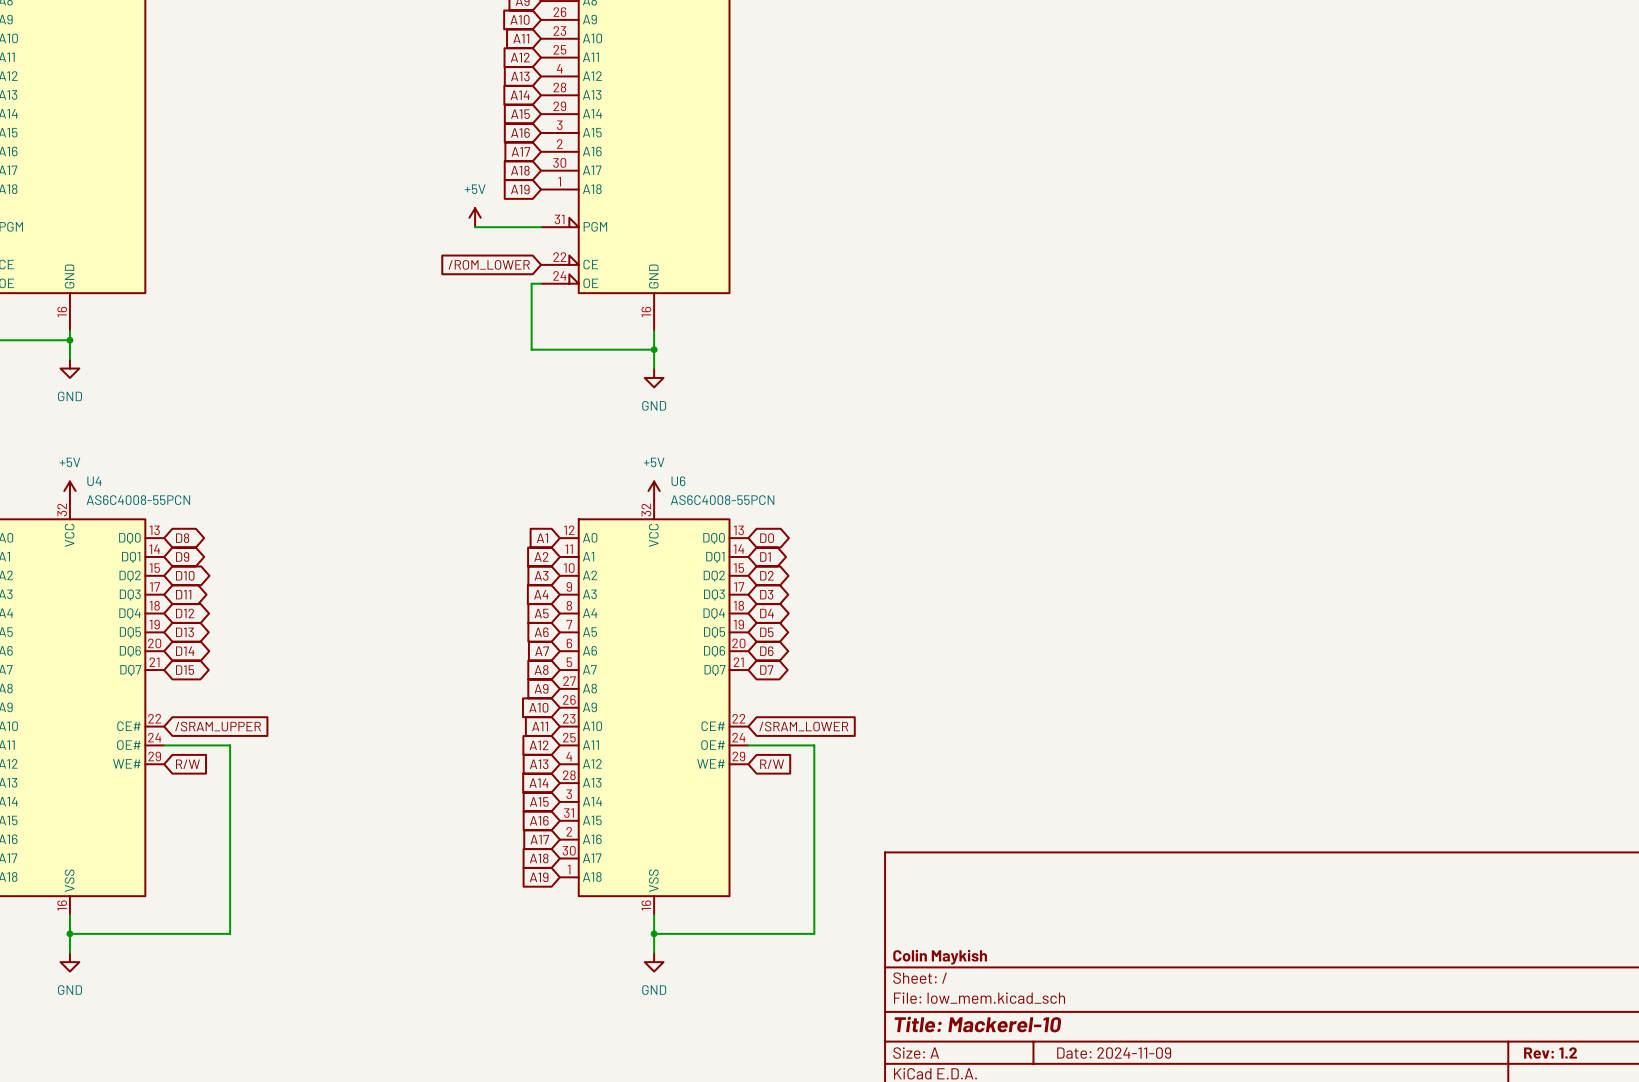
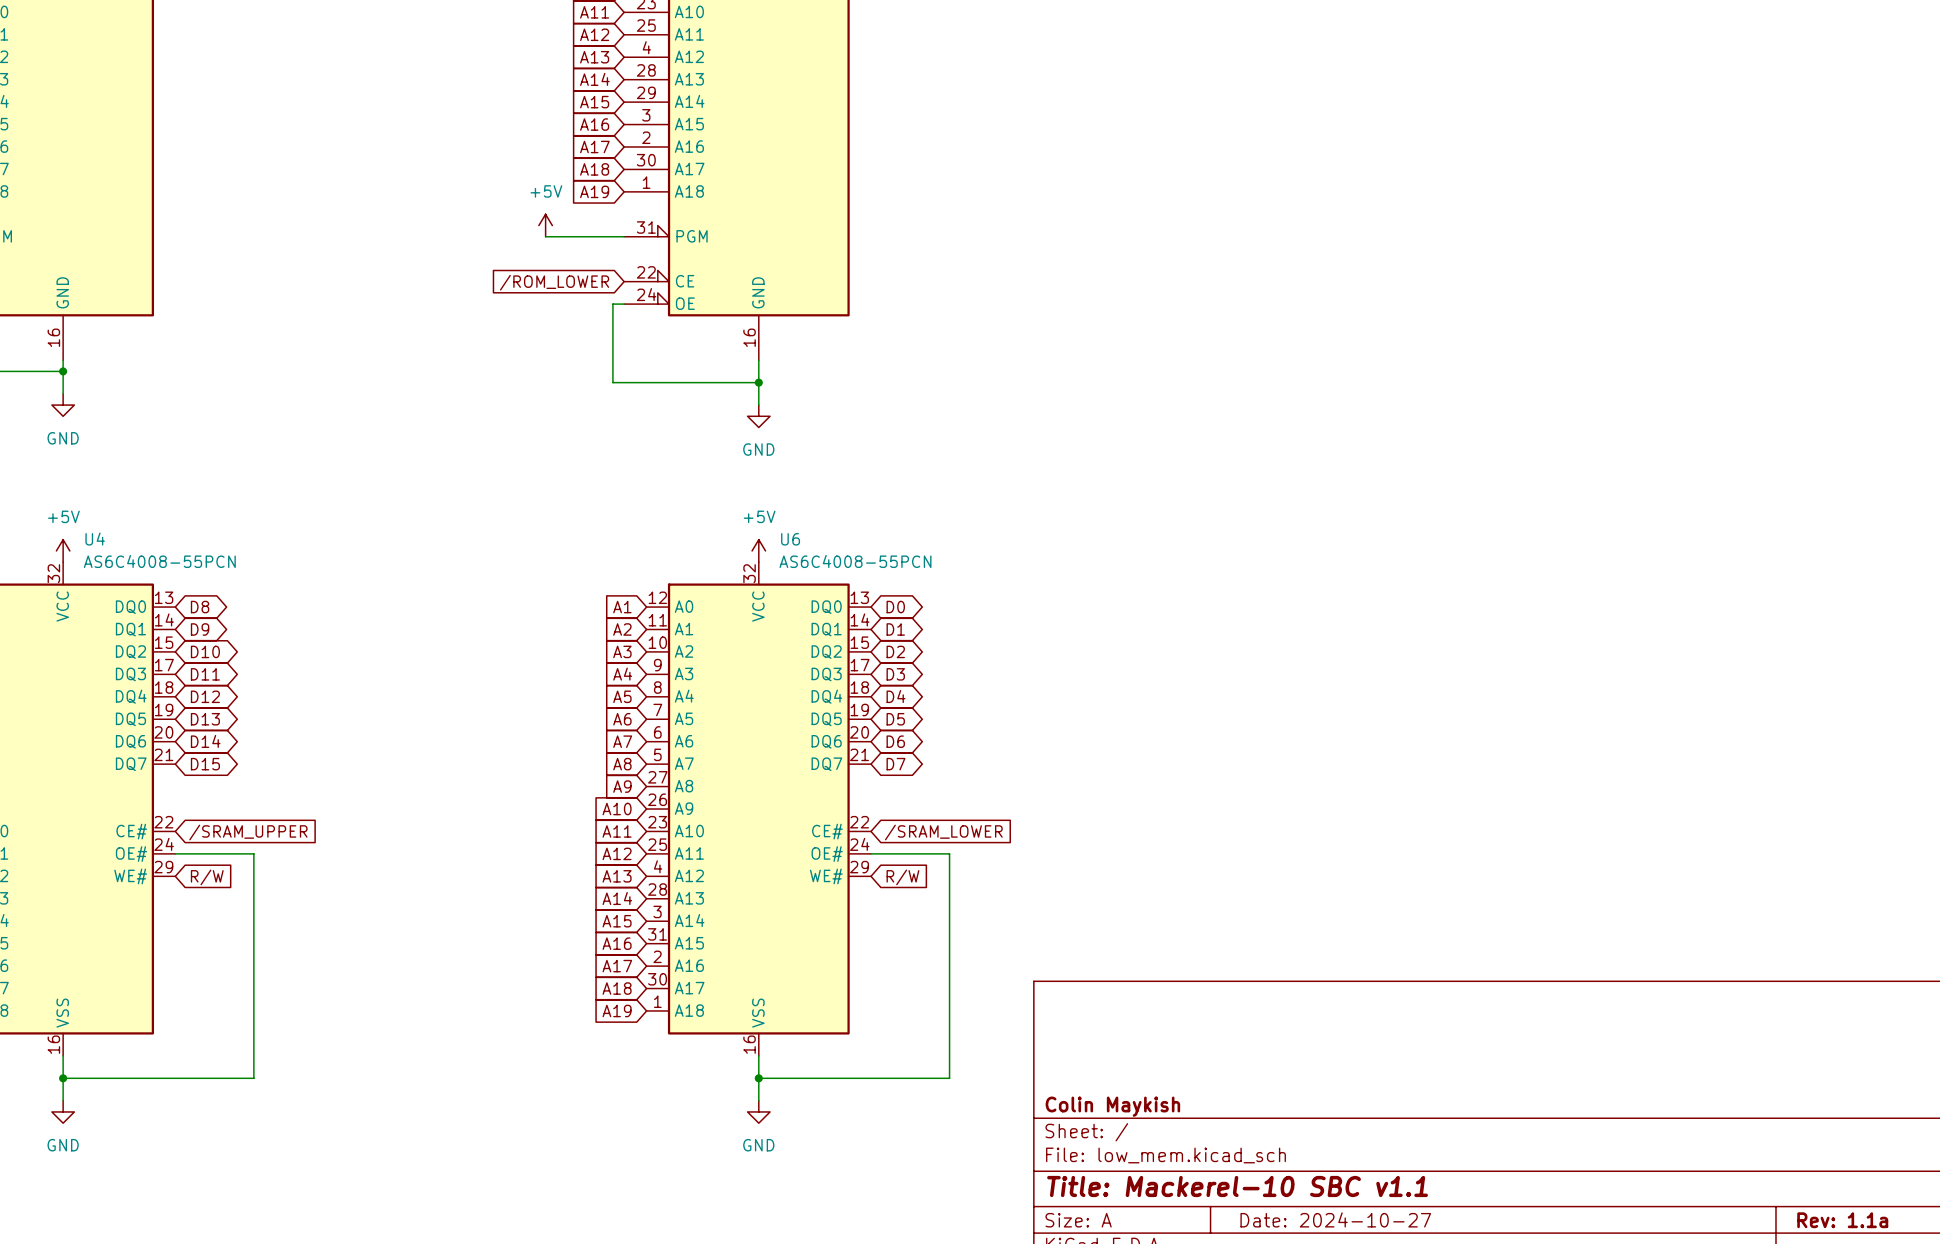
title block: Title: Mackerel-10 (977, 1024) -> Title: Mackerel-10 SBC v1.1 (1237, 1186)
title block: Date: 2024-11-09 (1114, 1053) -> Date: 2024-10-27 (1335, 1219)
title block: Rev: 1.2 (1550, 1053) -> Rev: 1.1a (1842, 1220)

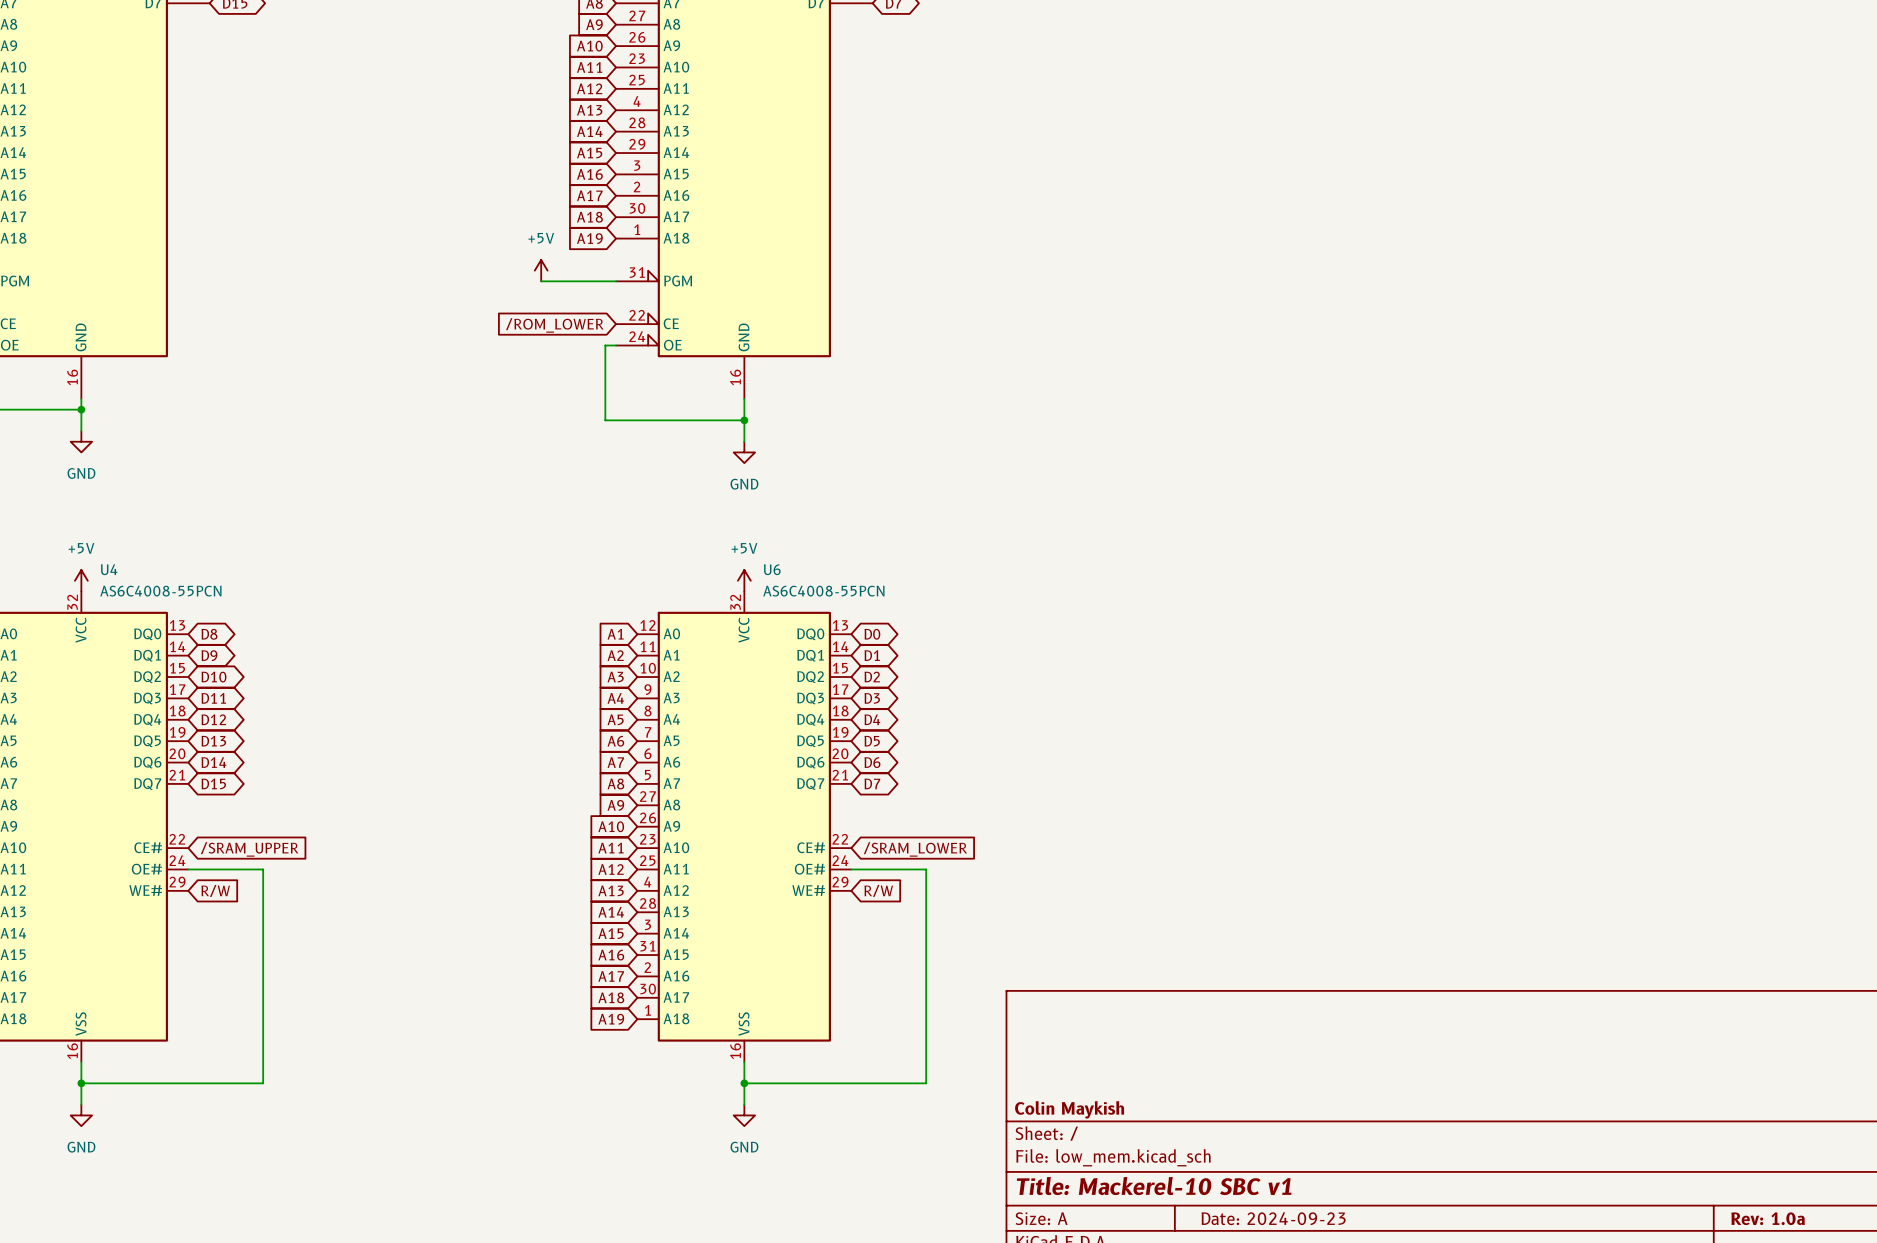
title block: Title: Mackerel-10 SBC v1.1 (1237, 1186) -> Title: Mackerel-10 SBC v1 (1154, 1186)
title block: Date: 2024-10-27 (1335, 1219) -> Date: 2024-09-23 (1273, 1218)
title block: Rev: 1.1a (1842, 1220) -> Rev: 1.0a (1768, 1218)

